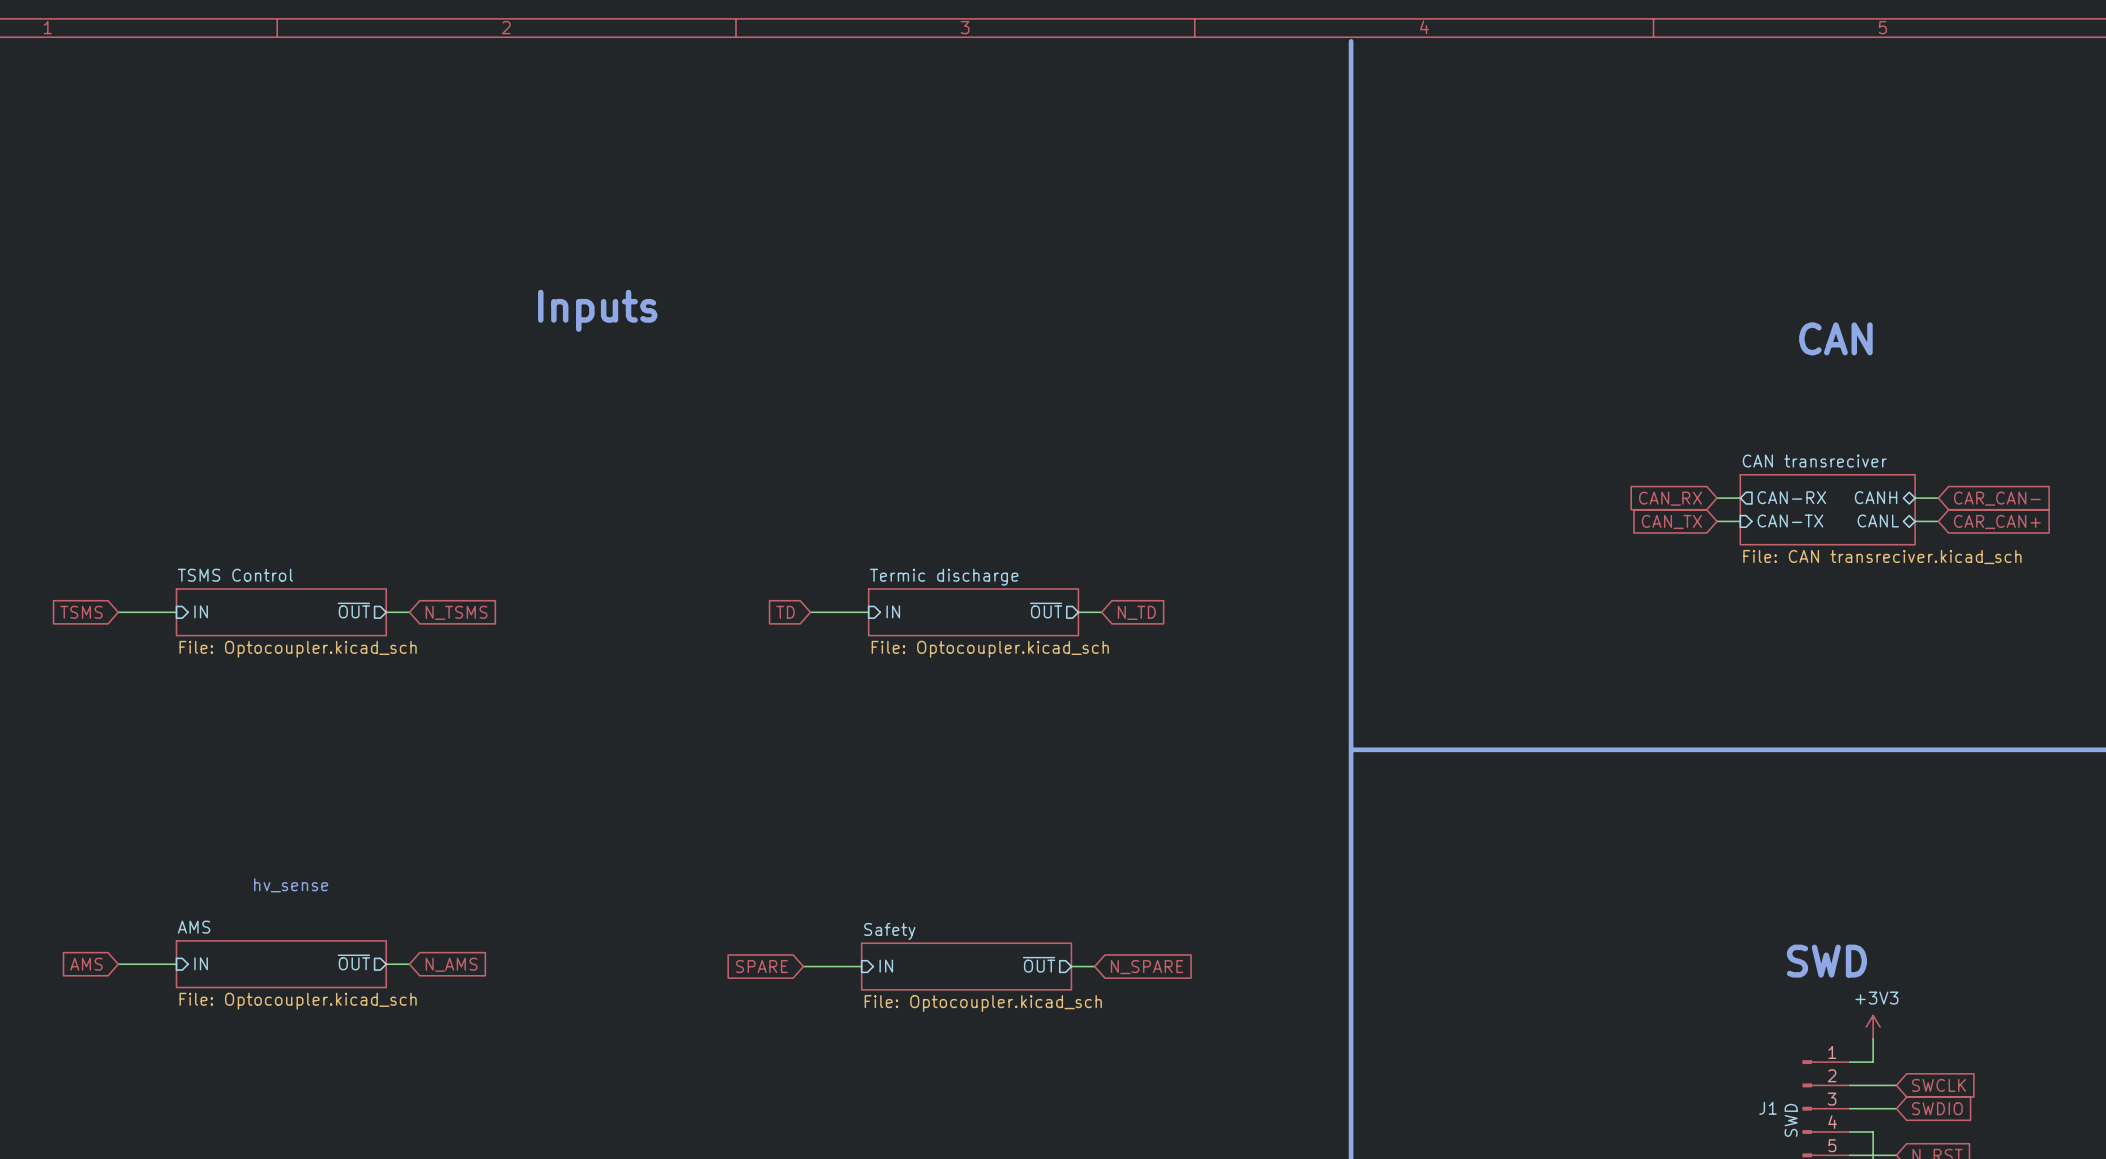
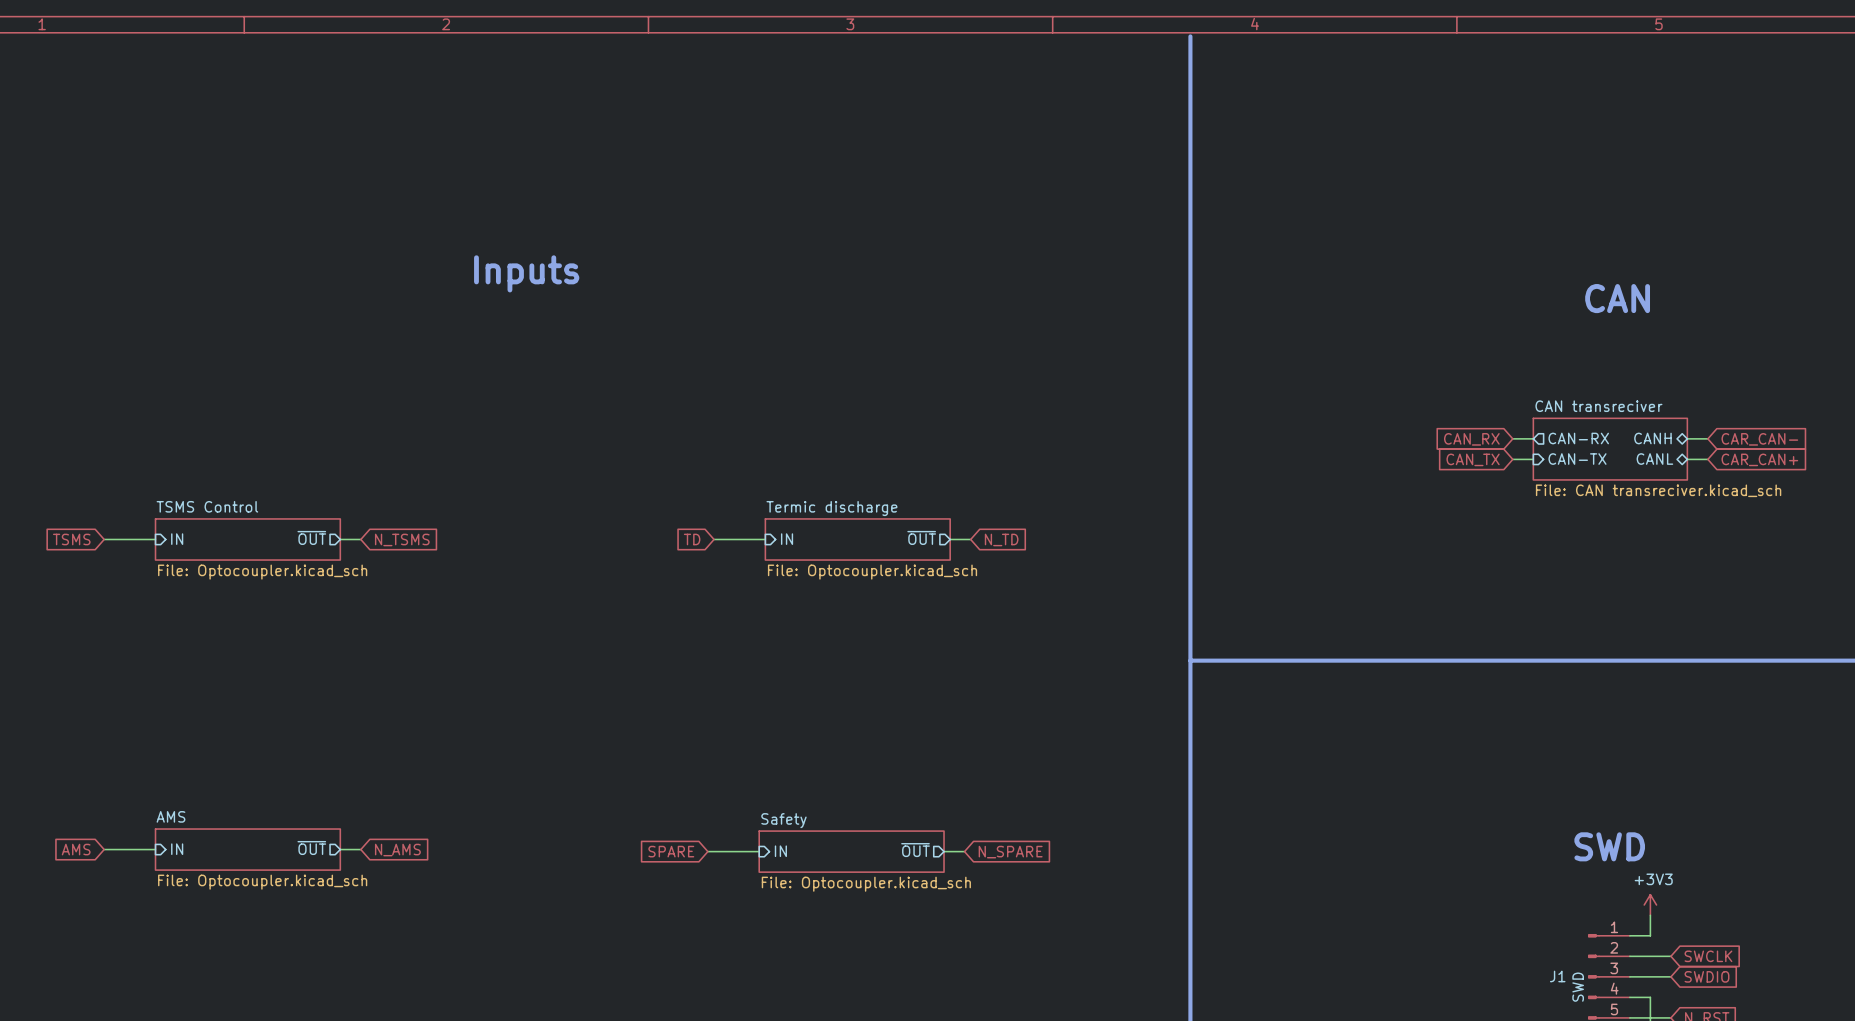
text: hv_sense (291, 885) -> none

